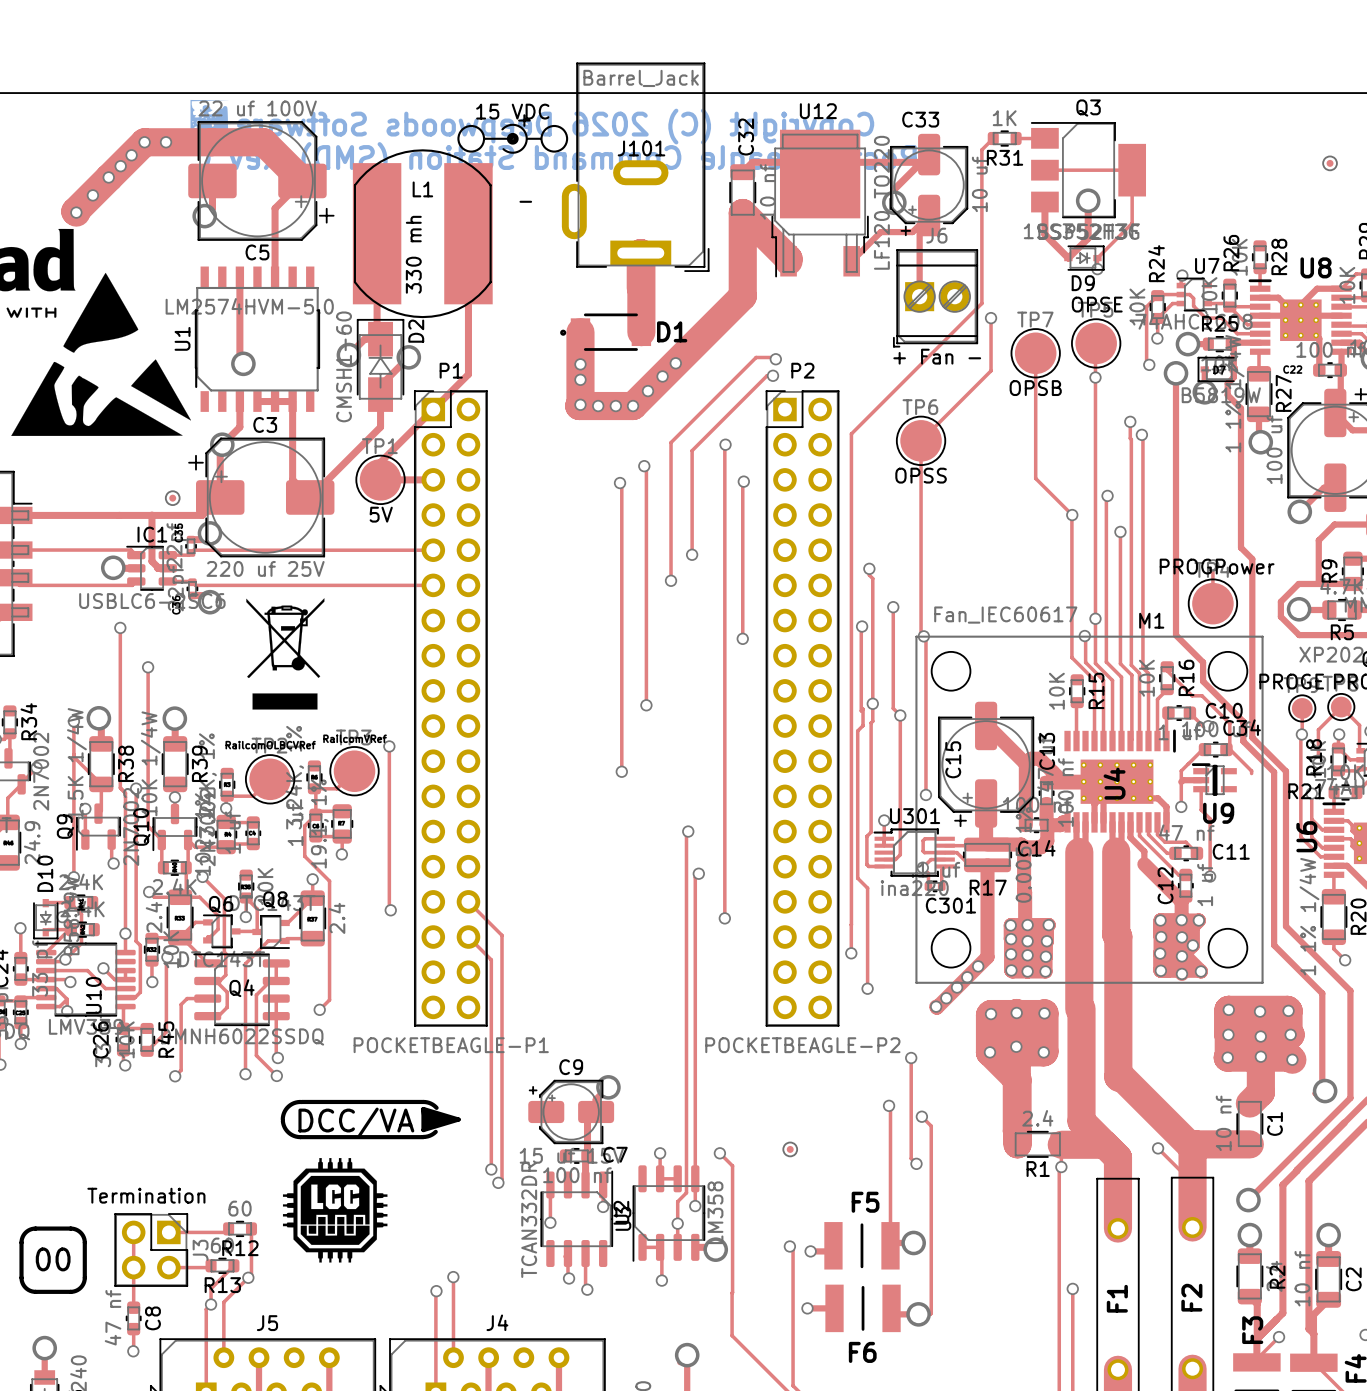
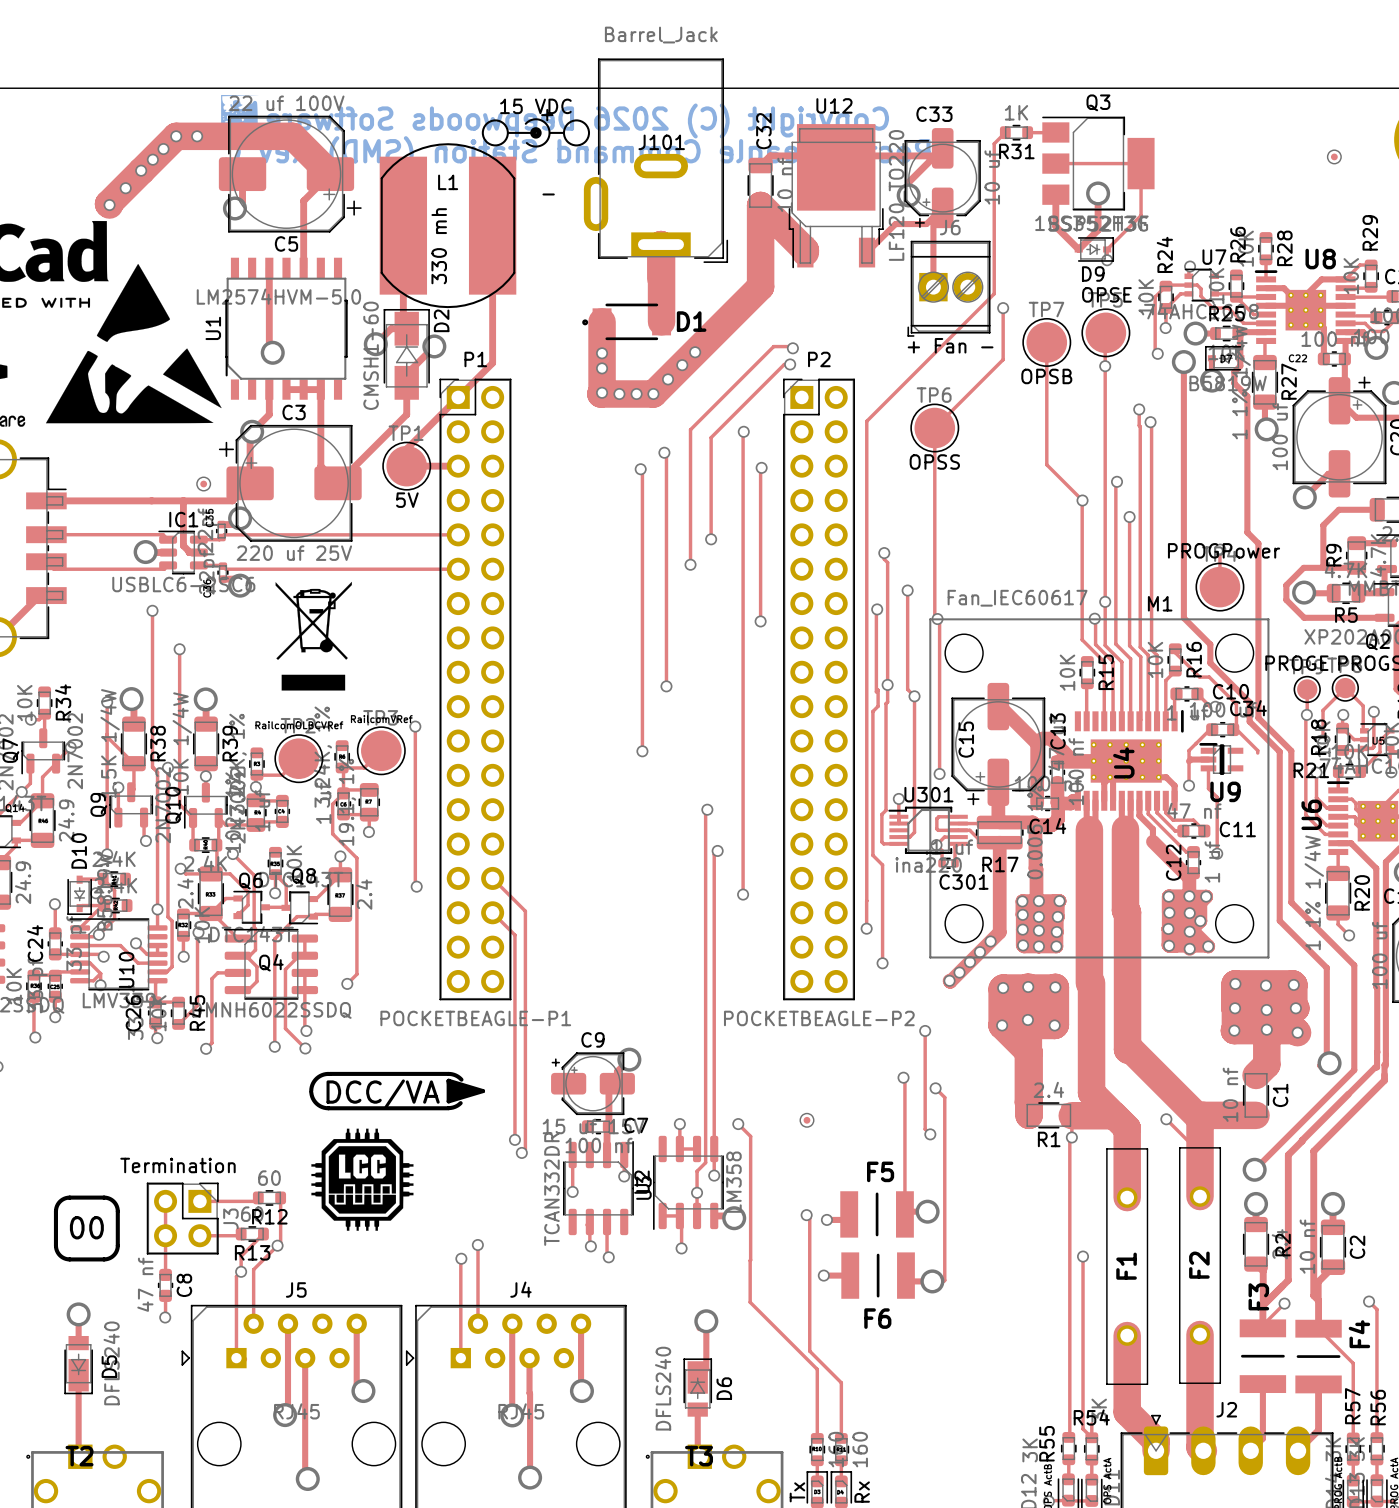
J101 value position: Barrel_Jack (641, 78) -> Barrel_Jack (661, 35)

